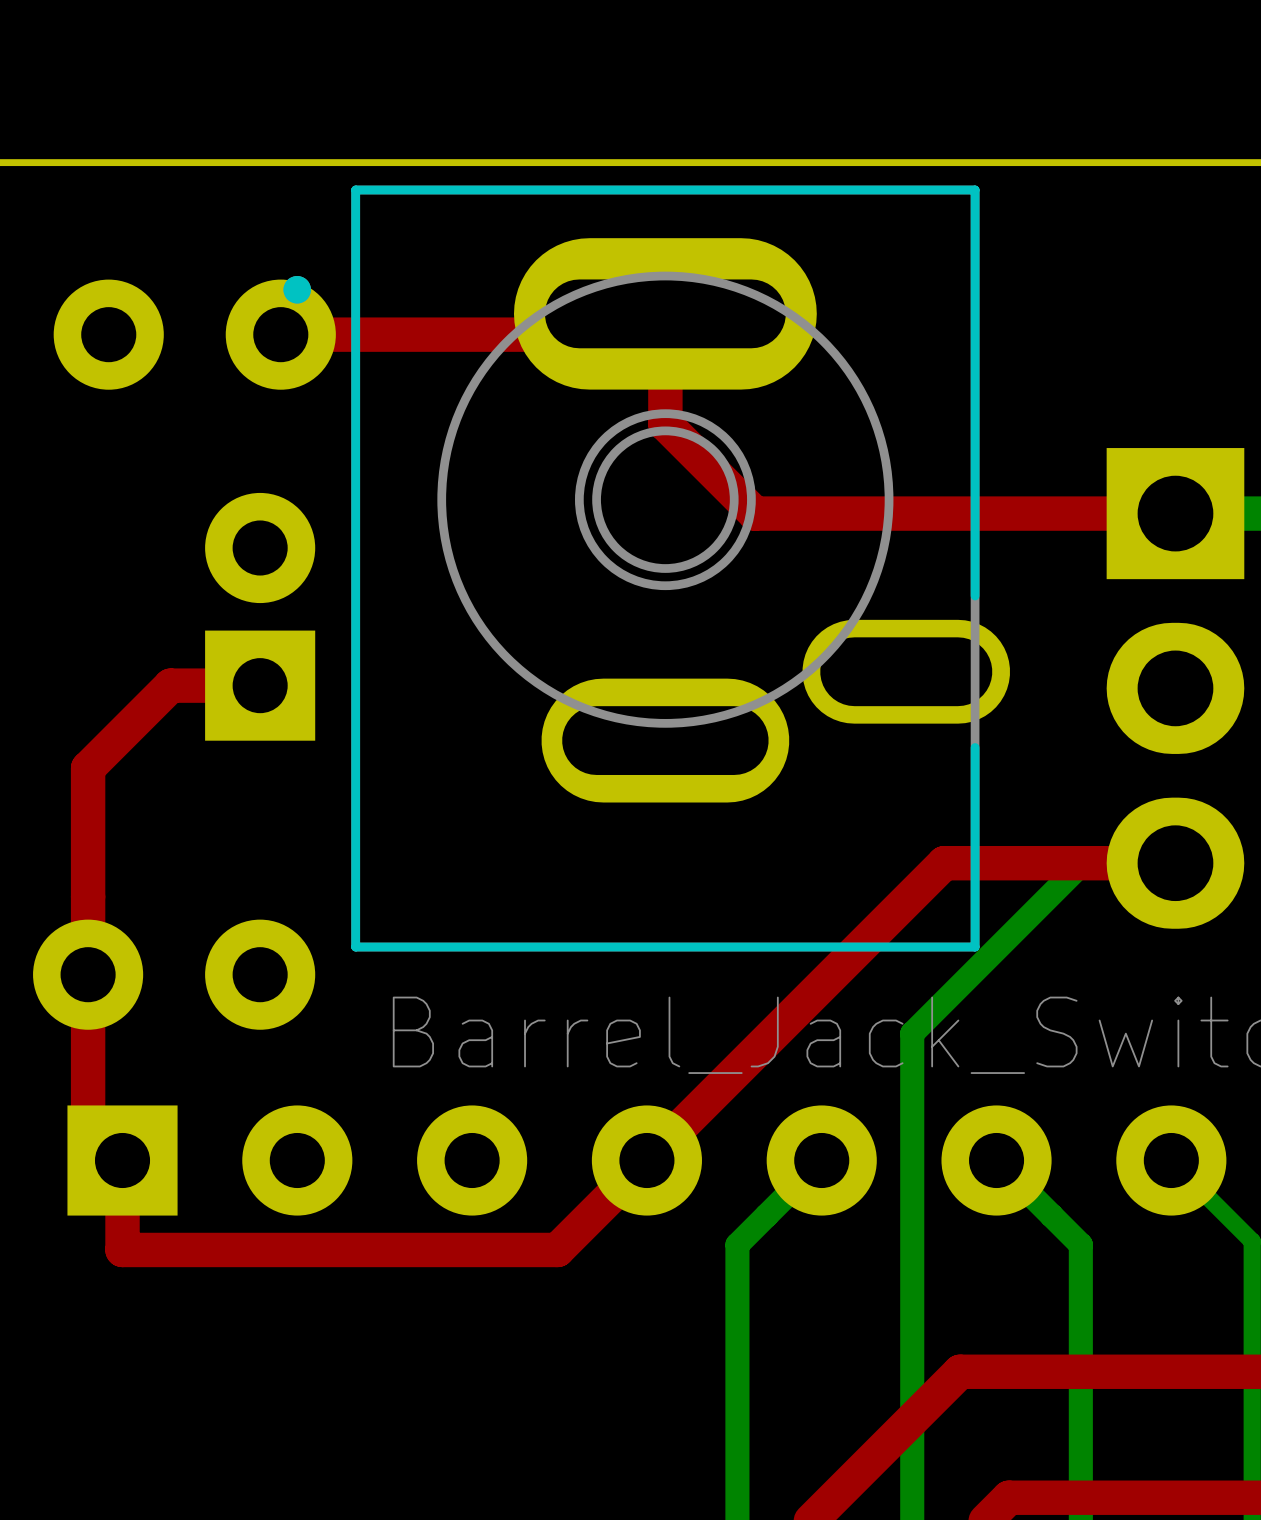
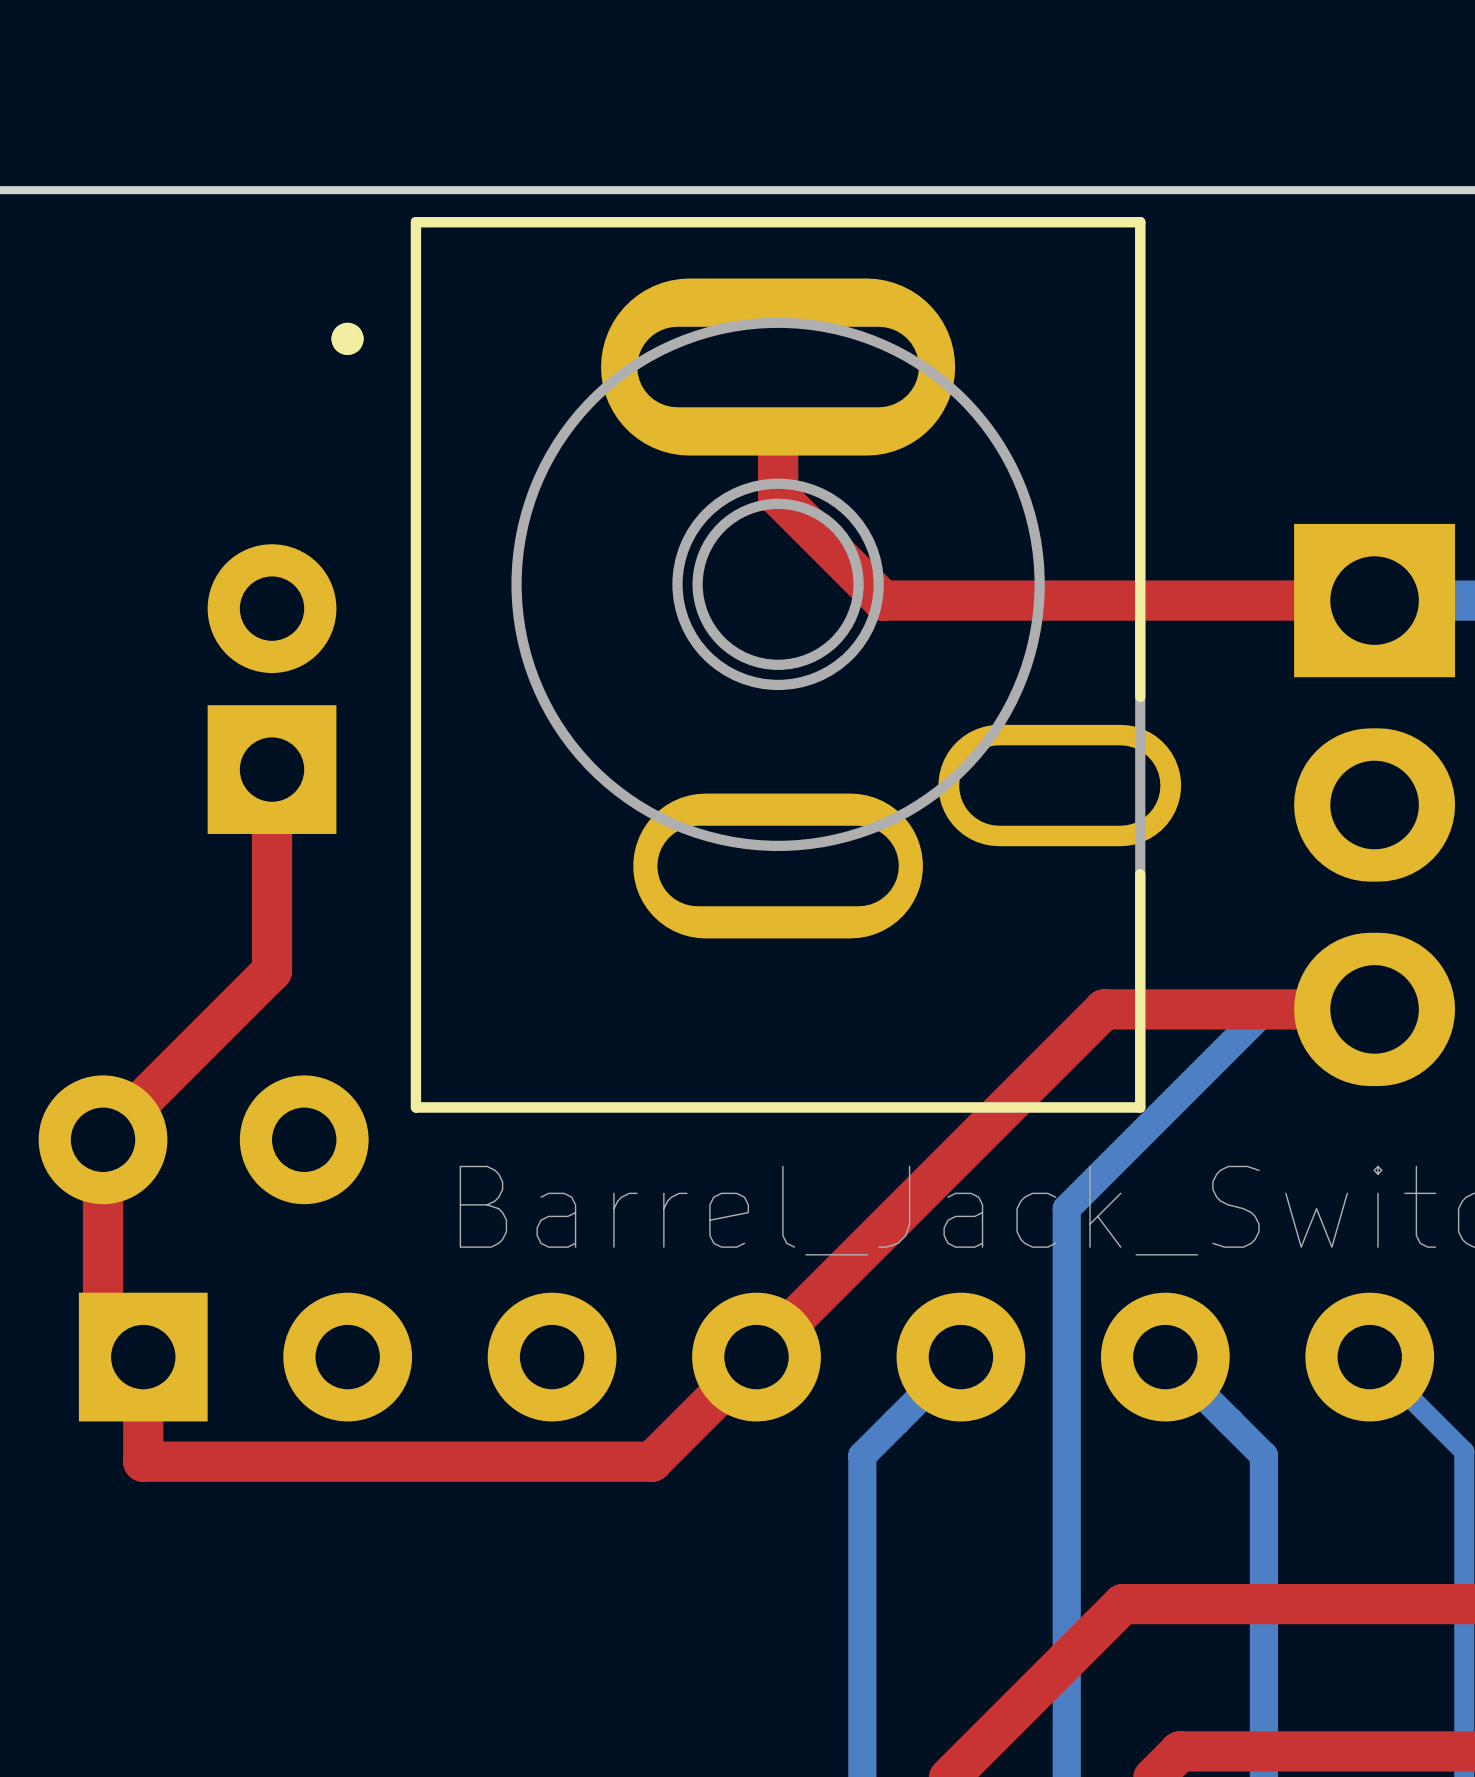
top track: (665, 313) (644, 334) (280, 334) -> none
part: (194, 334) -> none
part position: (260, 616) -> (272, 689)
top track: (260, 685) (170, 685) (88, 768) (88, 974) -> (272, 769) (272, 970) (103, 1139)

